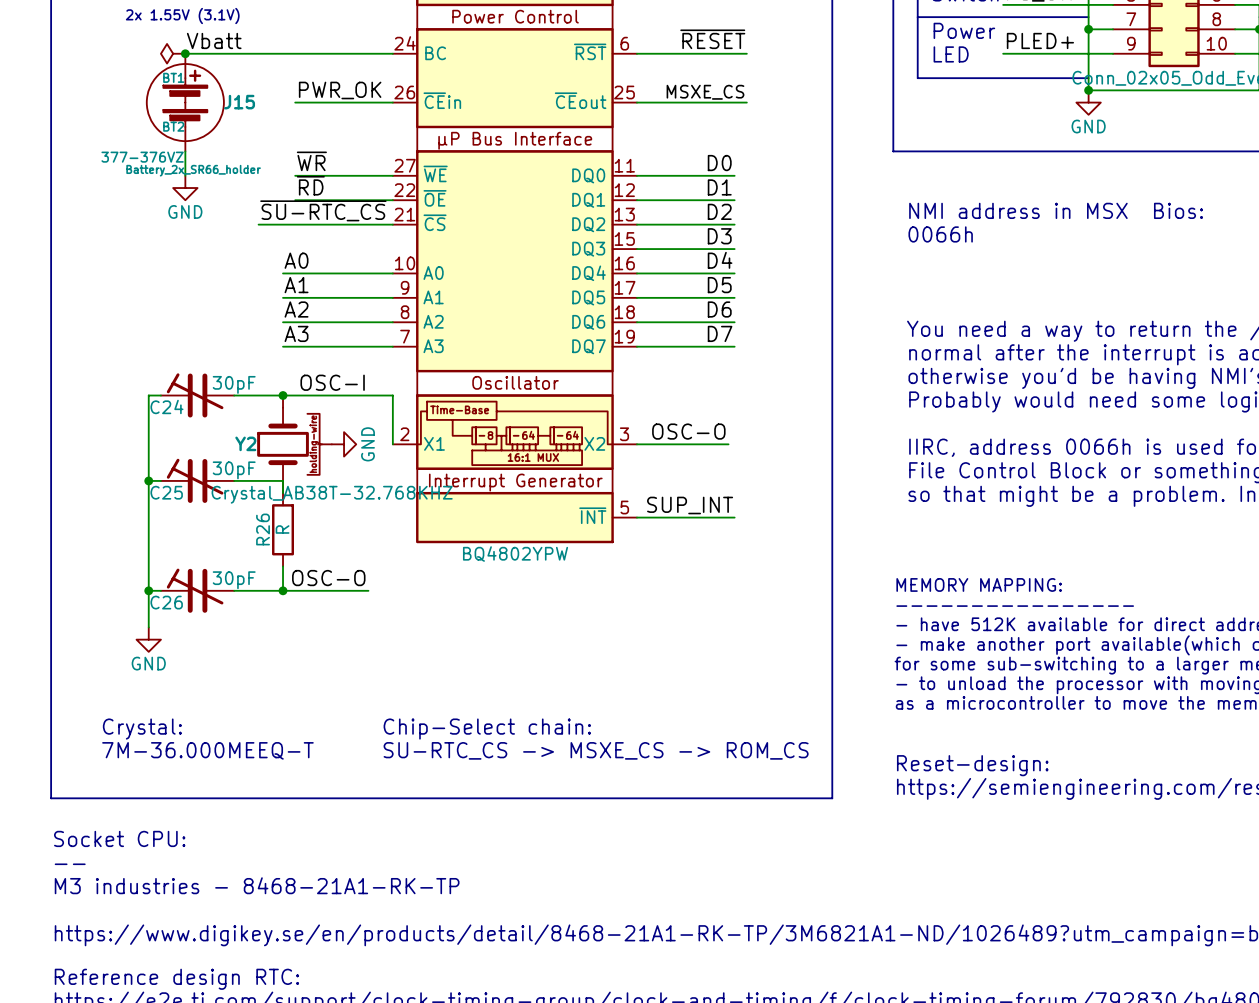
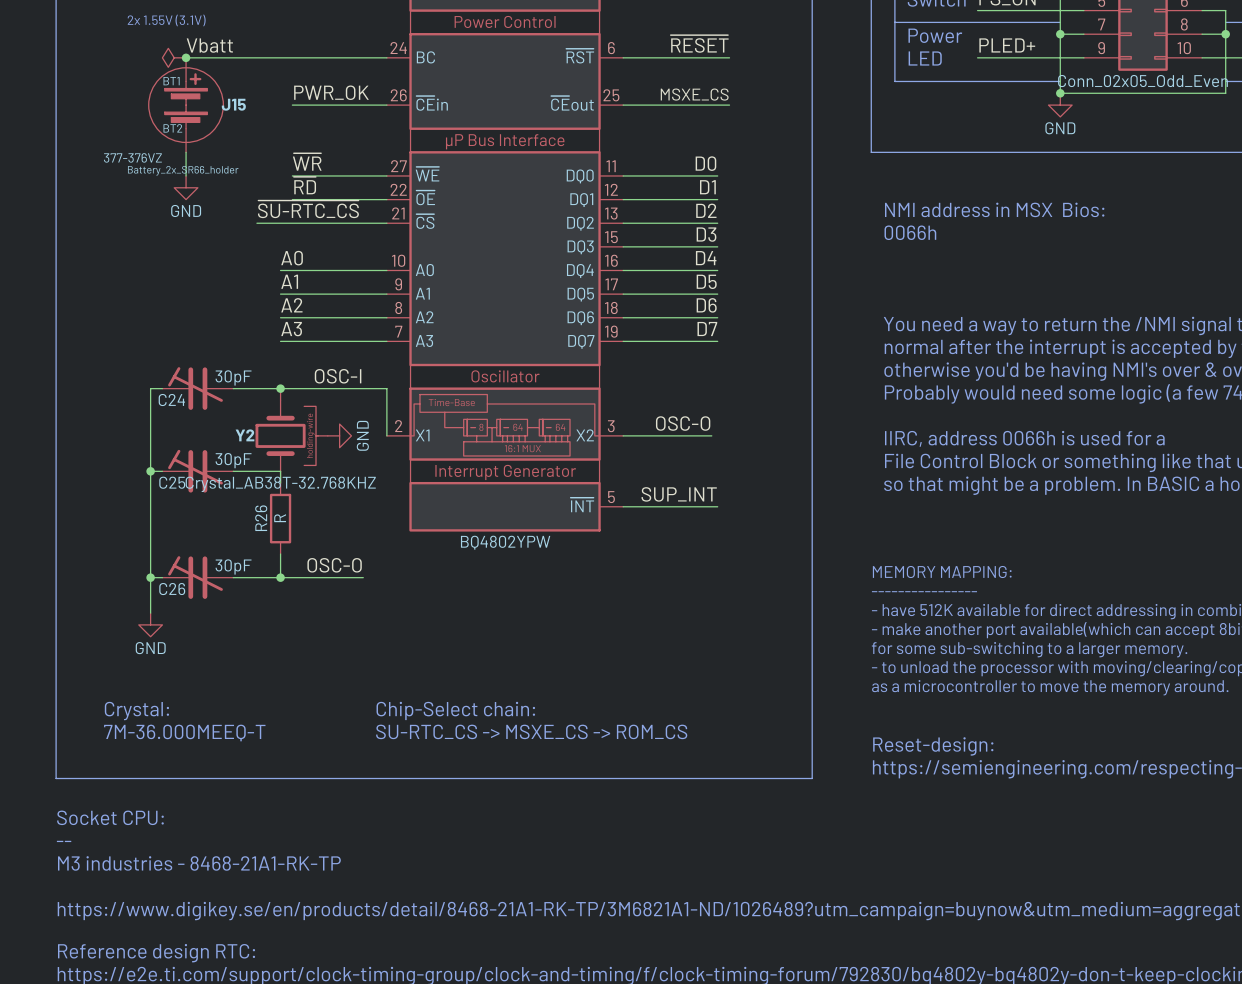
Y2 value position: Crystal_AB38T-32.768KHZ (332, 494) -> Crystal_AB38T-32.768KHZ (280, 484)

